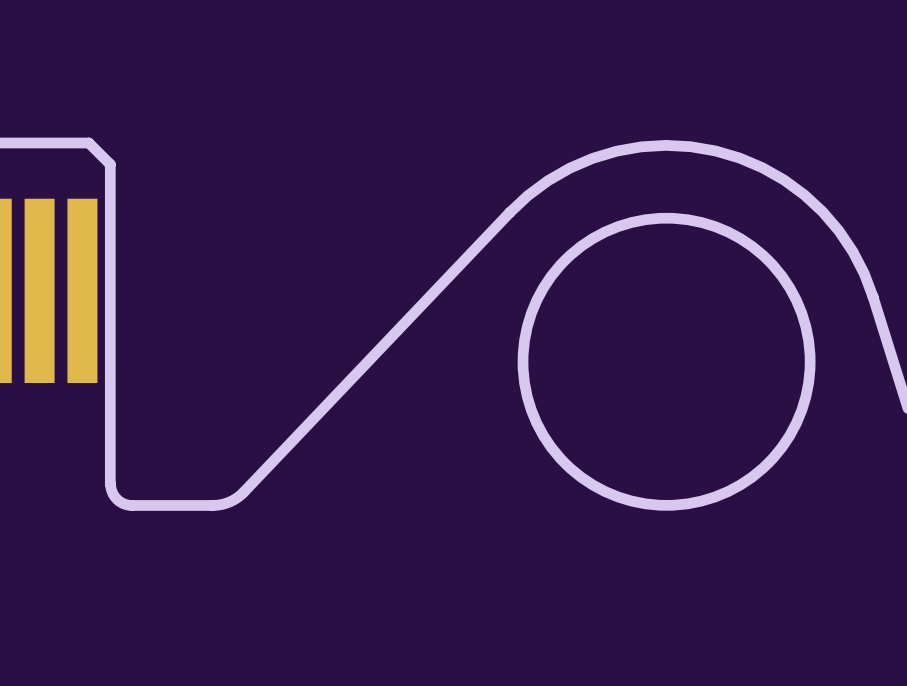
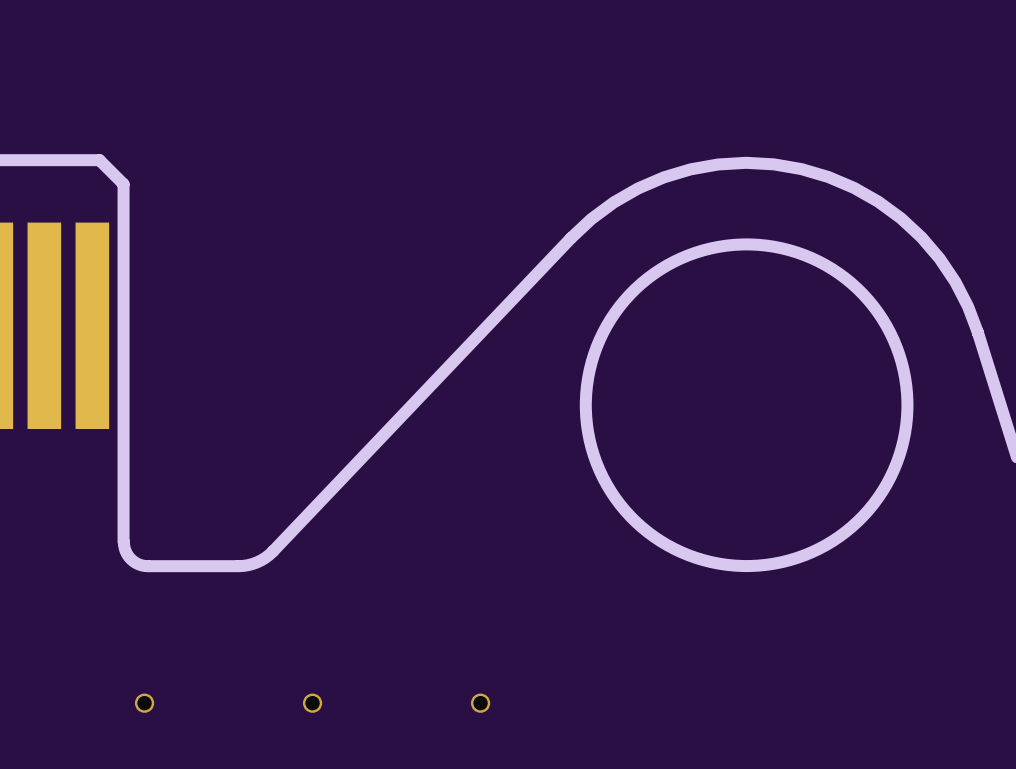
via: none -> (144, 703)
via: none -> (312, 703)
via: none -> (480, 703)

